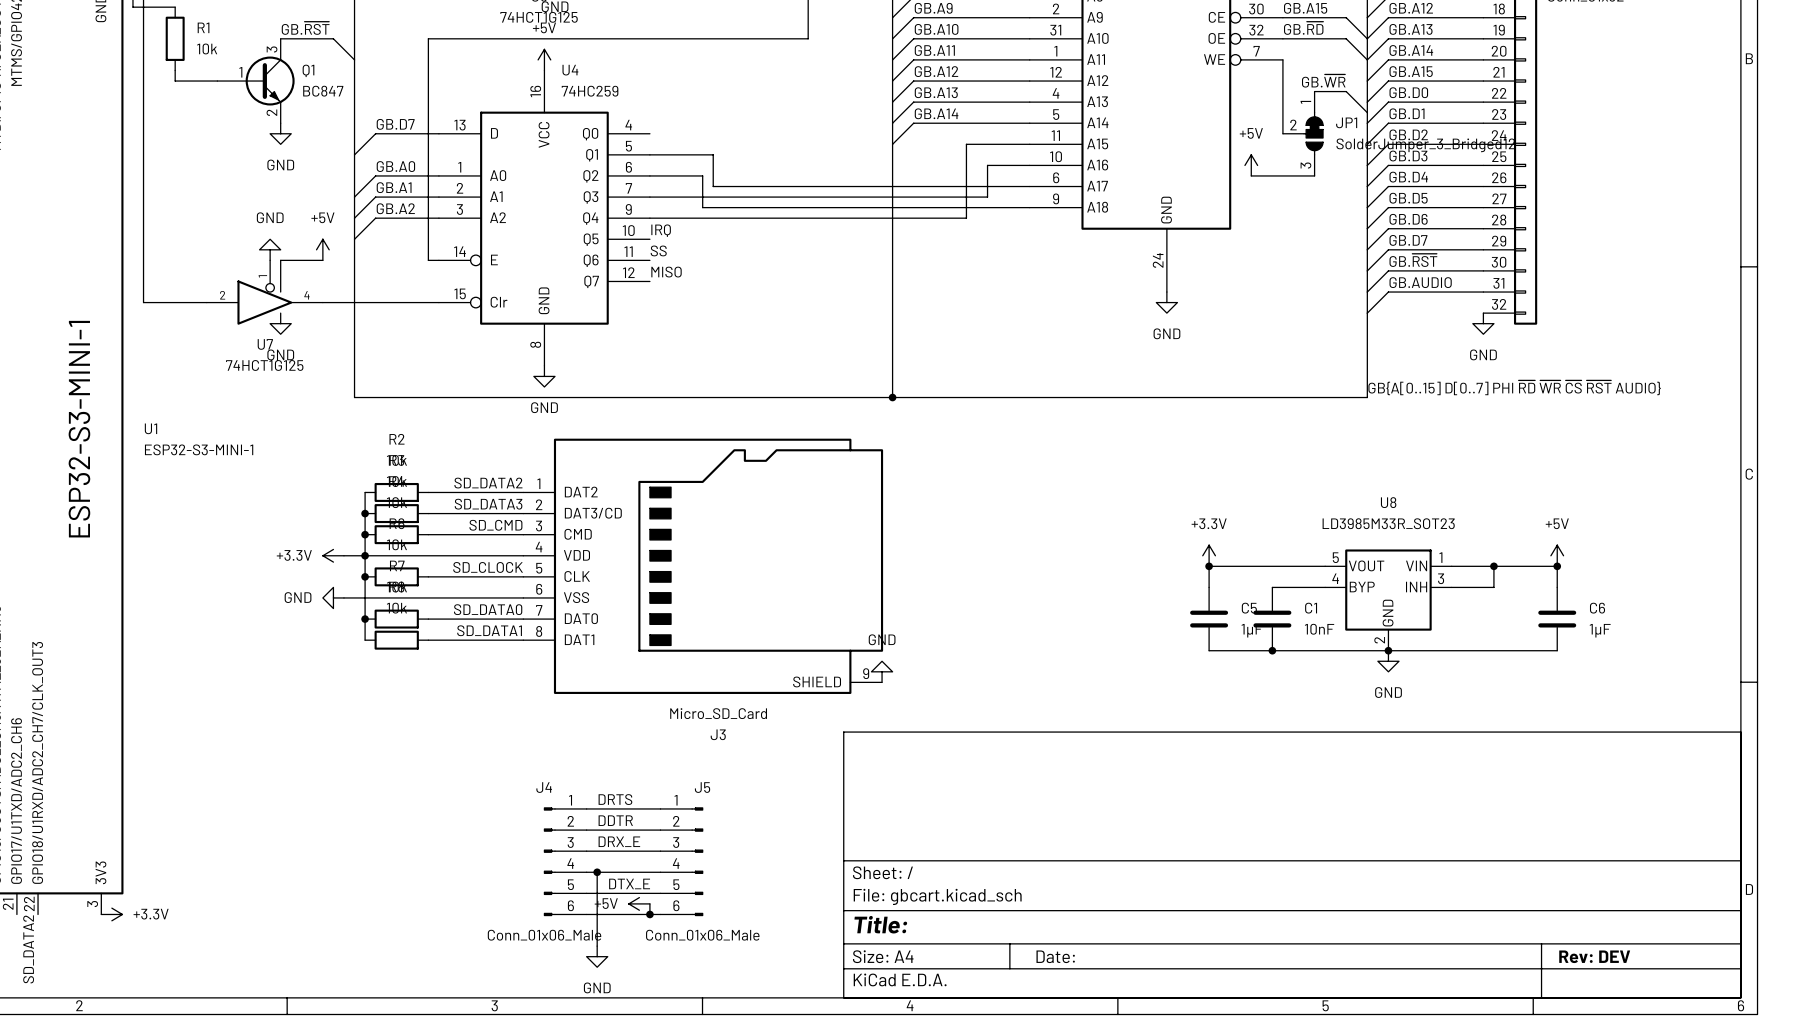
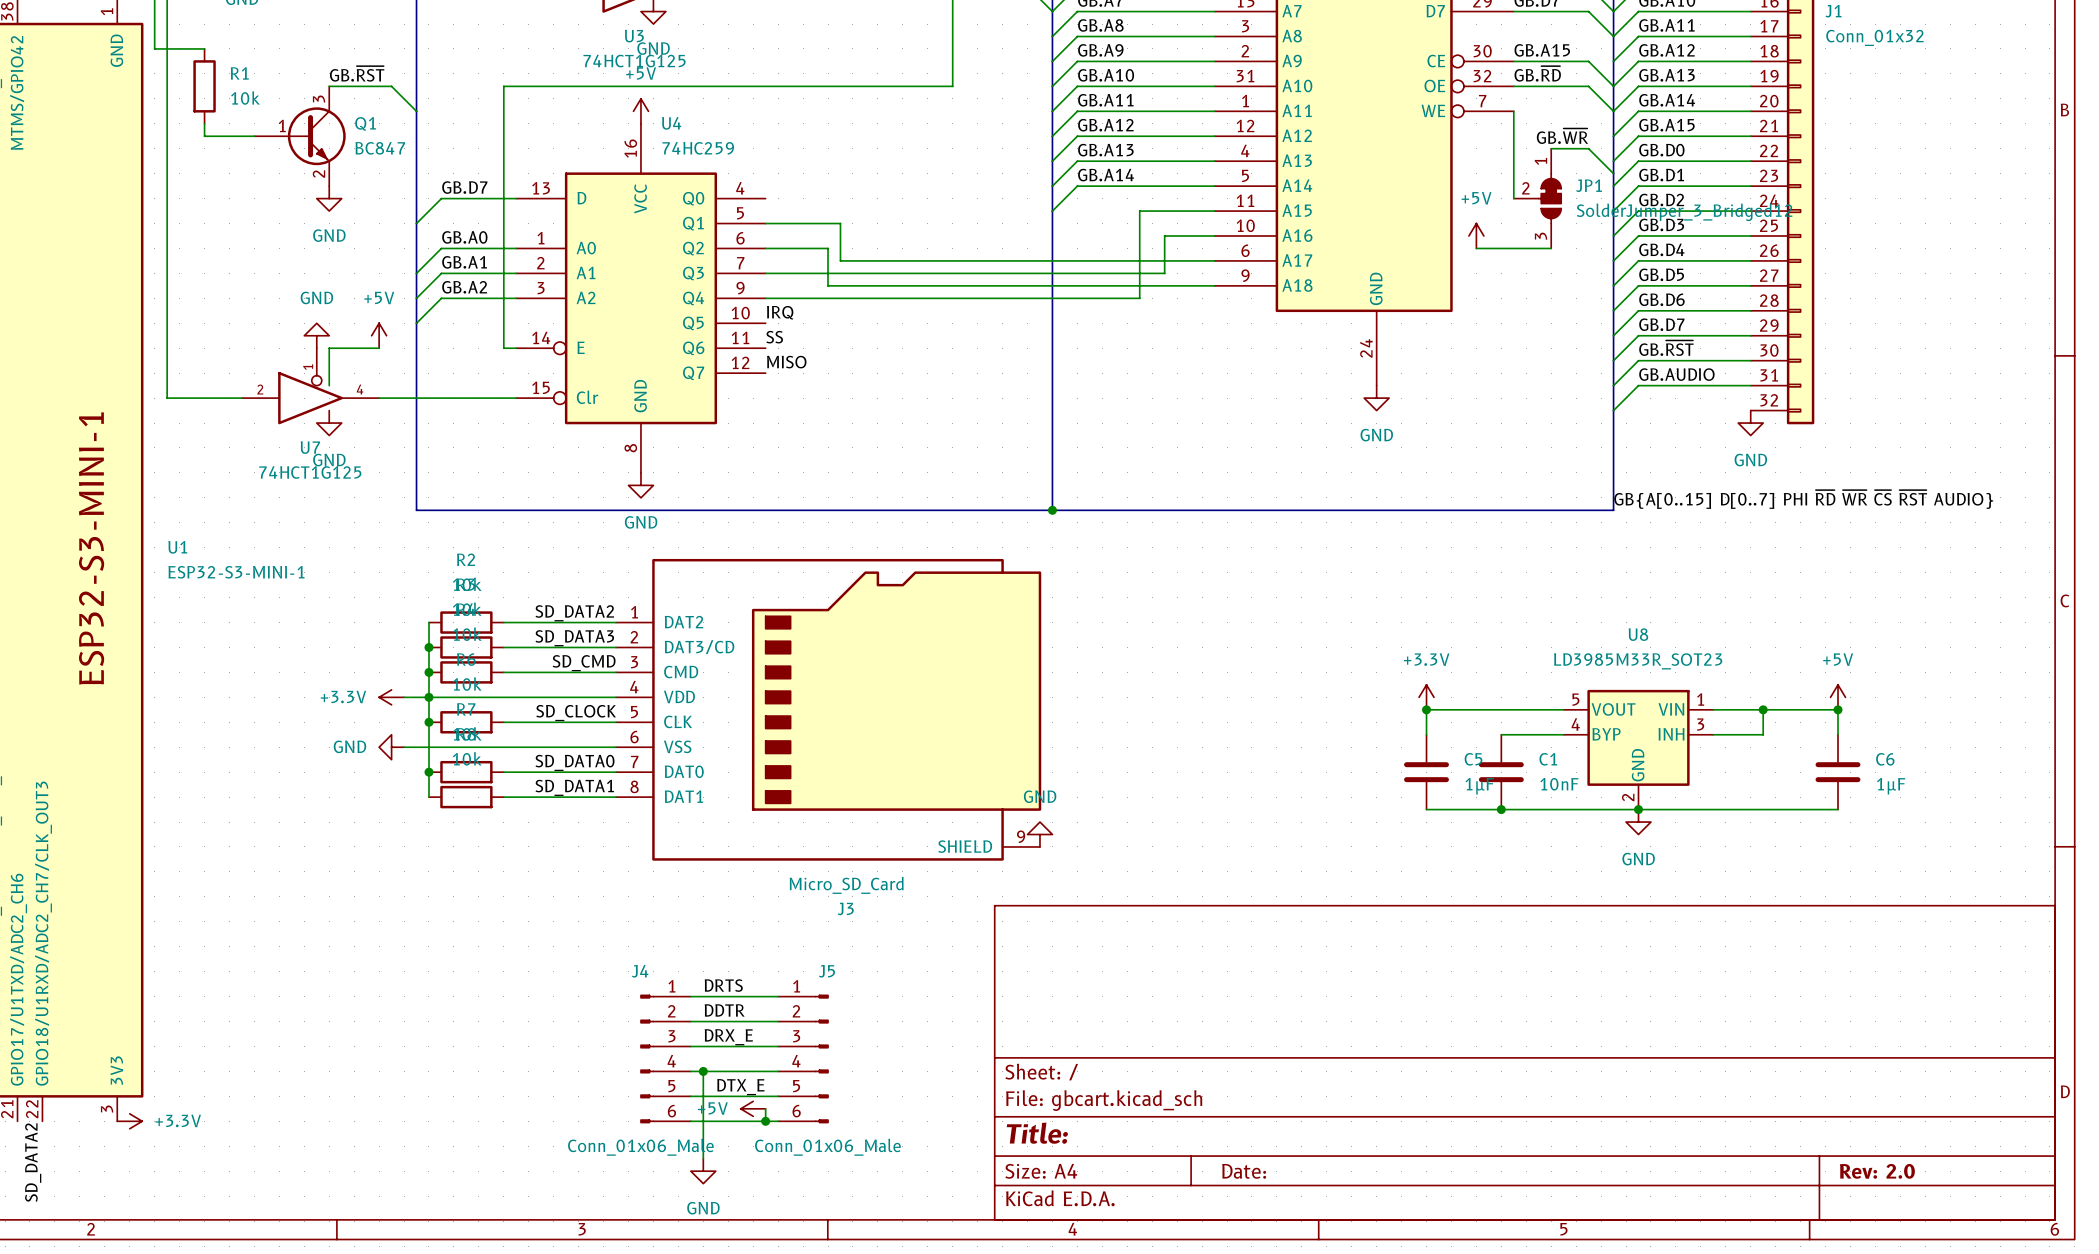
title block: Rev: DEV (1594, 956) -> Rev: 2.0 (1877, 1171)

